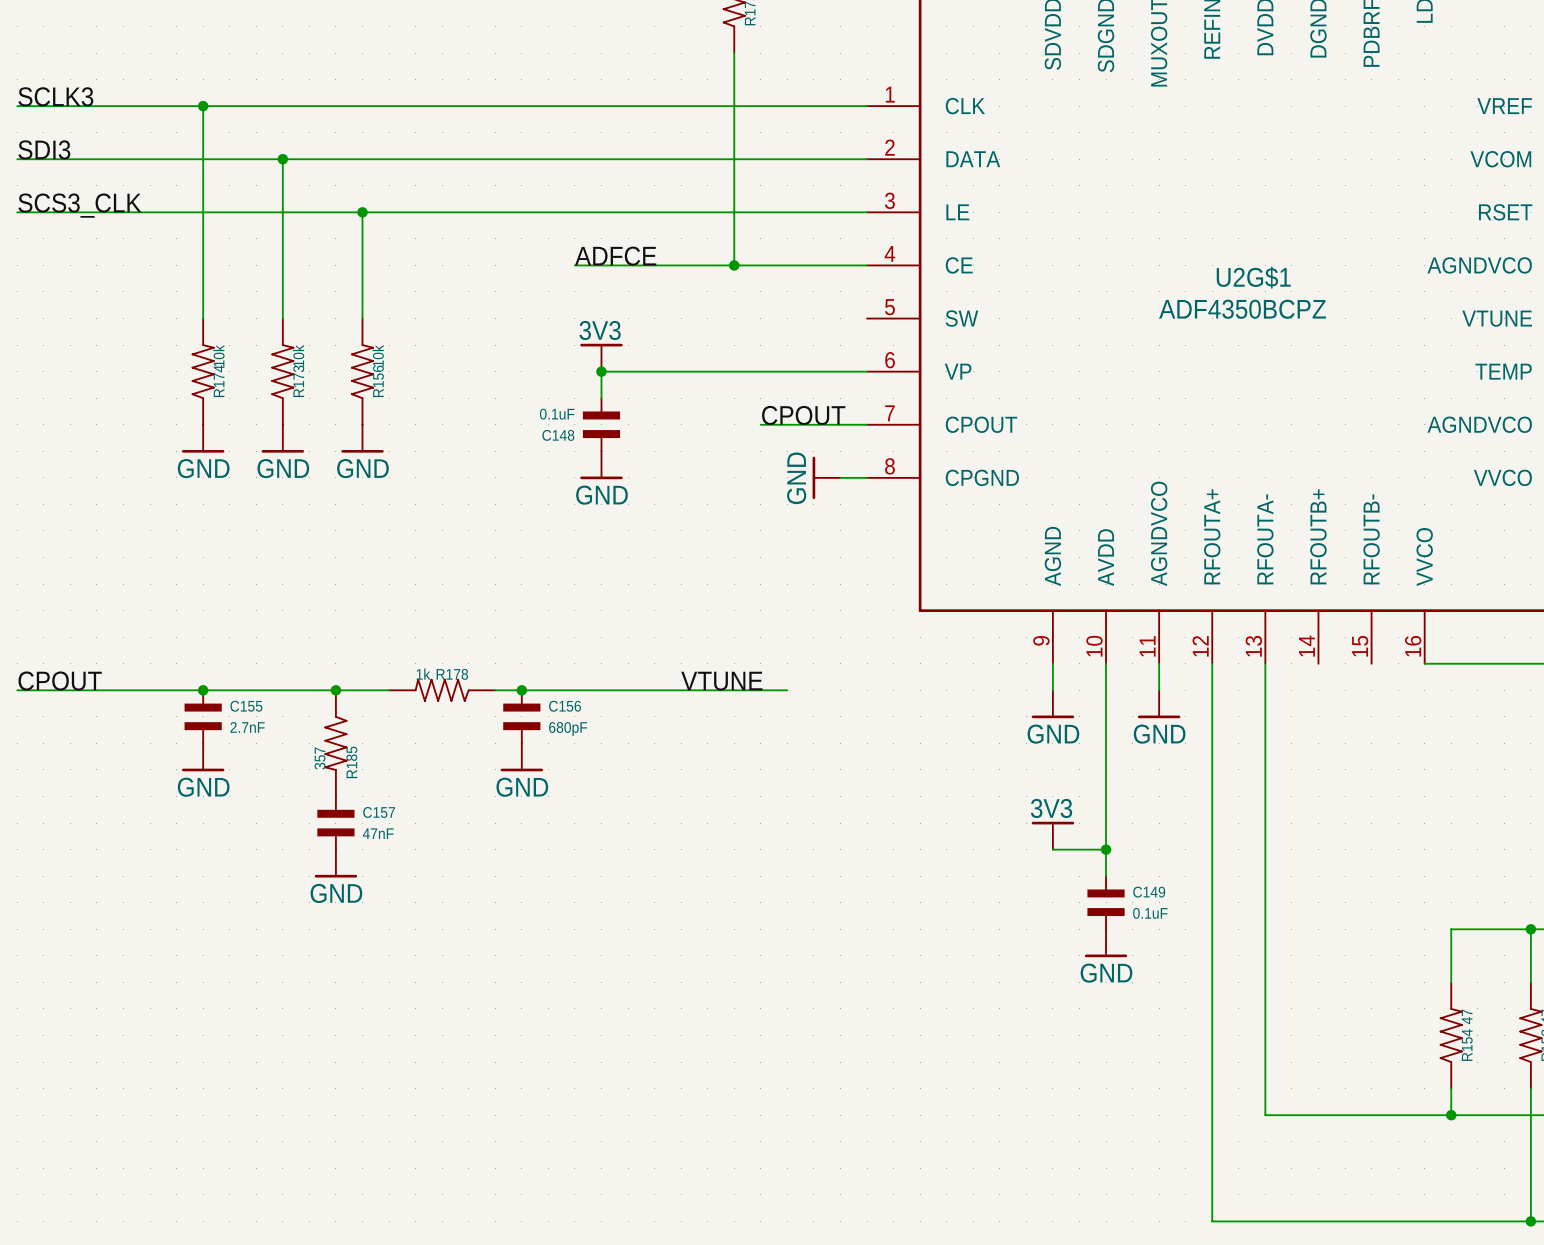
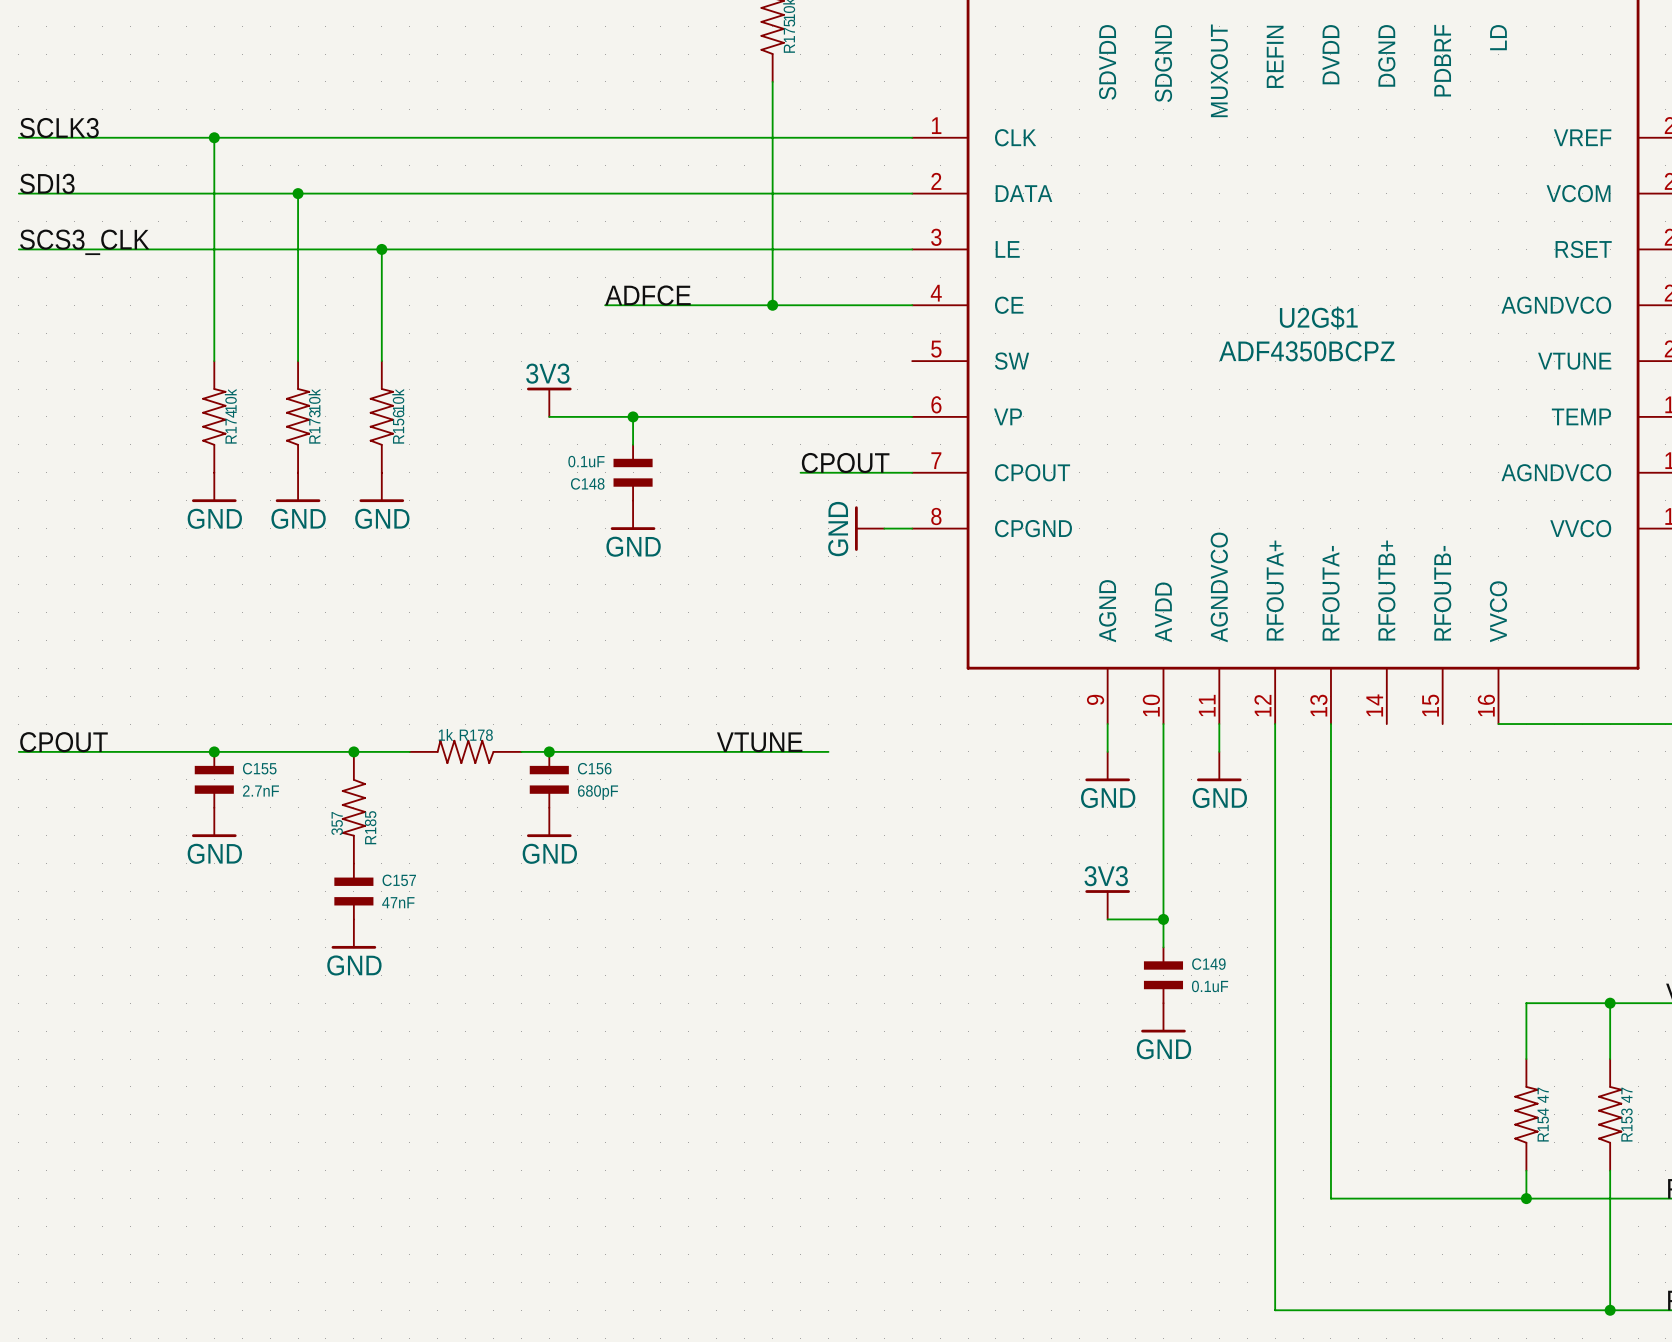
power symbol position: 3V3 (601, 357) -> 3V3 (549, 402)
wire: none -> (549, 416) (633, 416)

